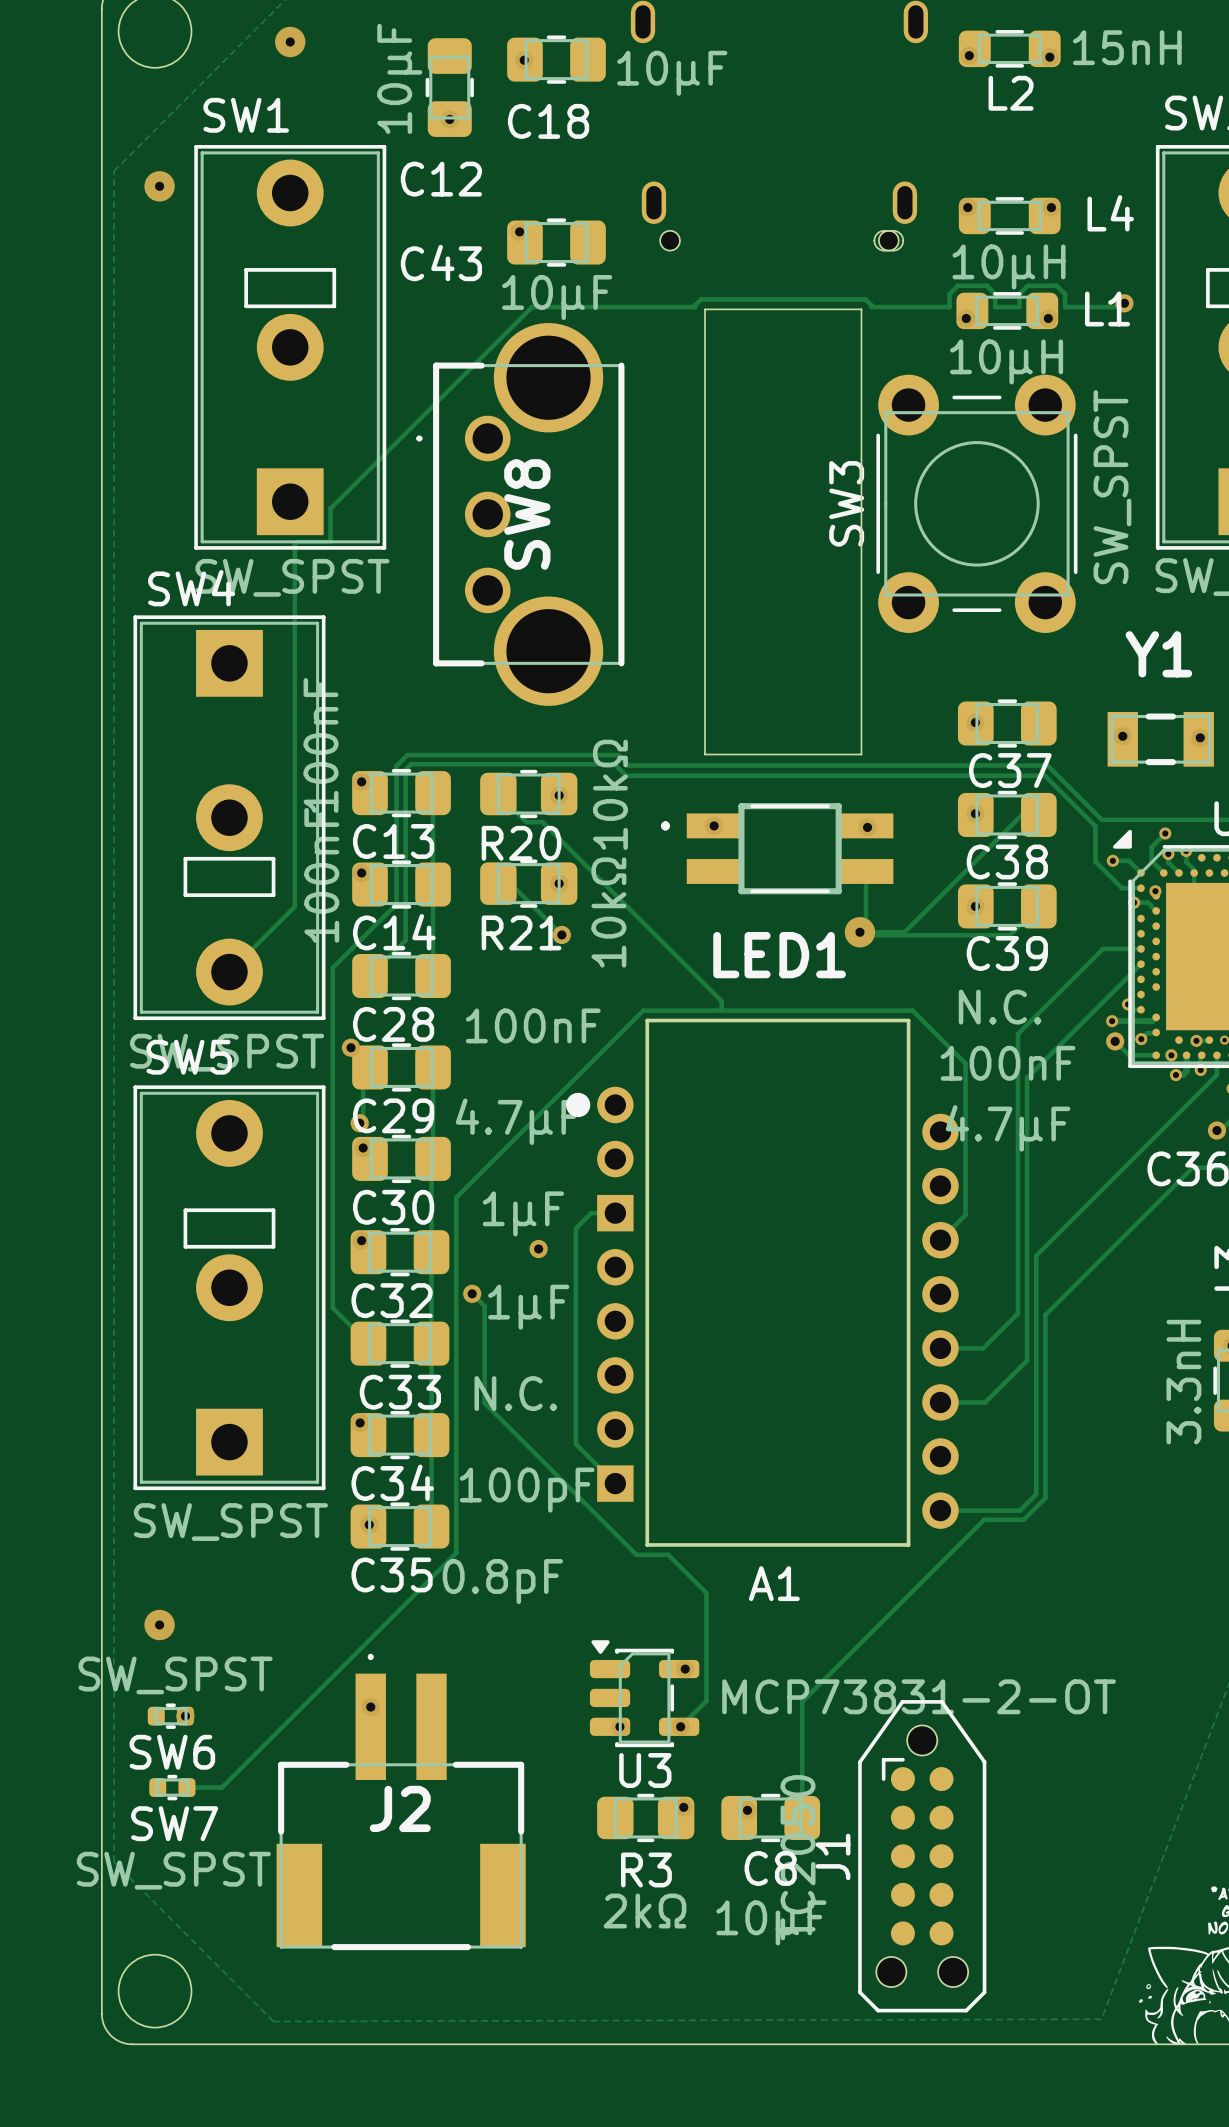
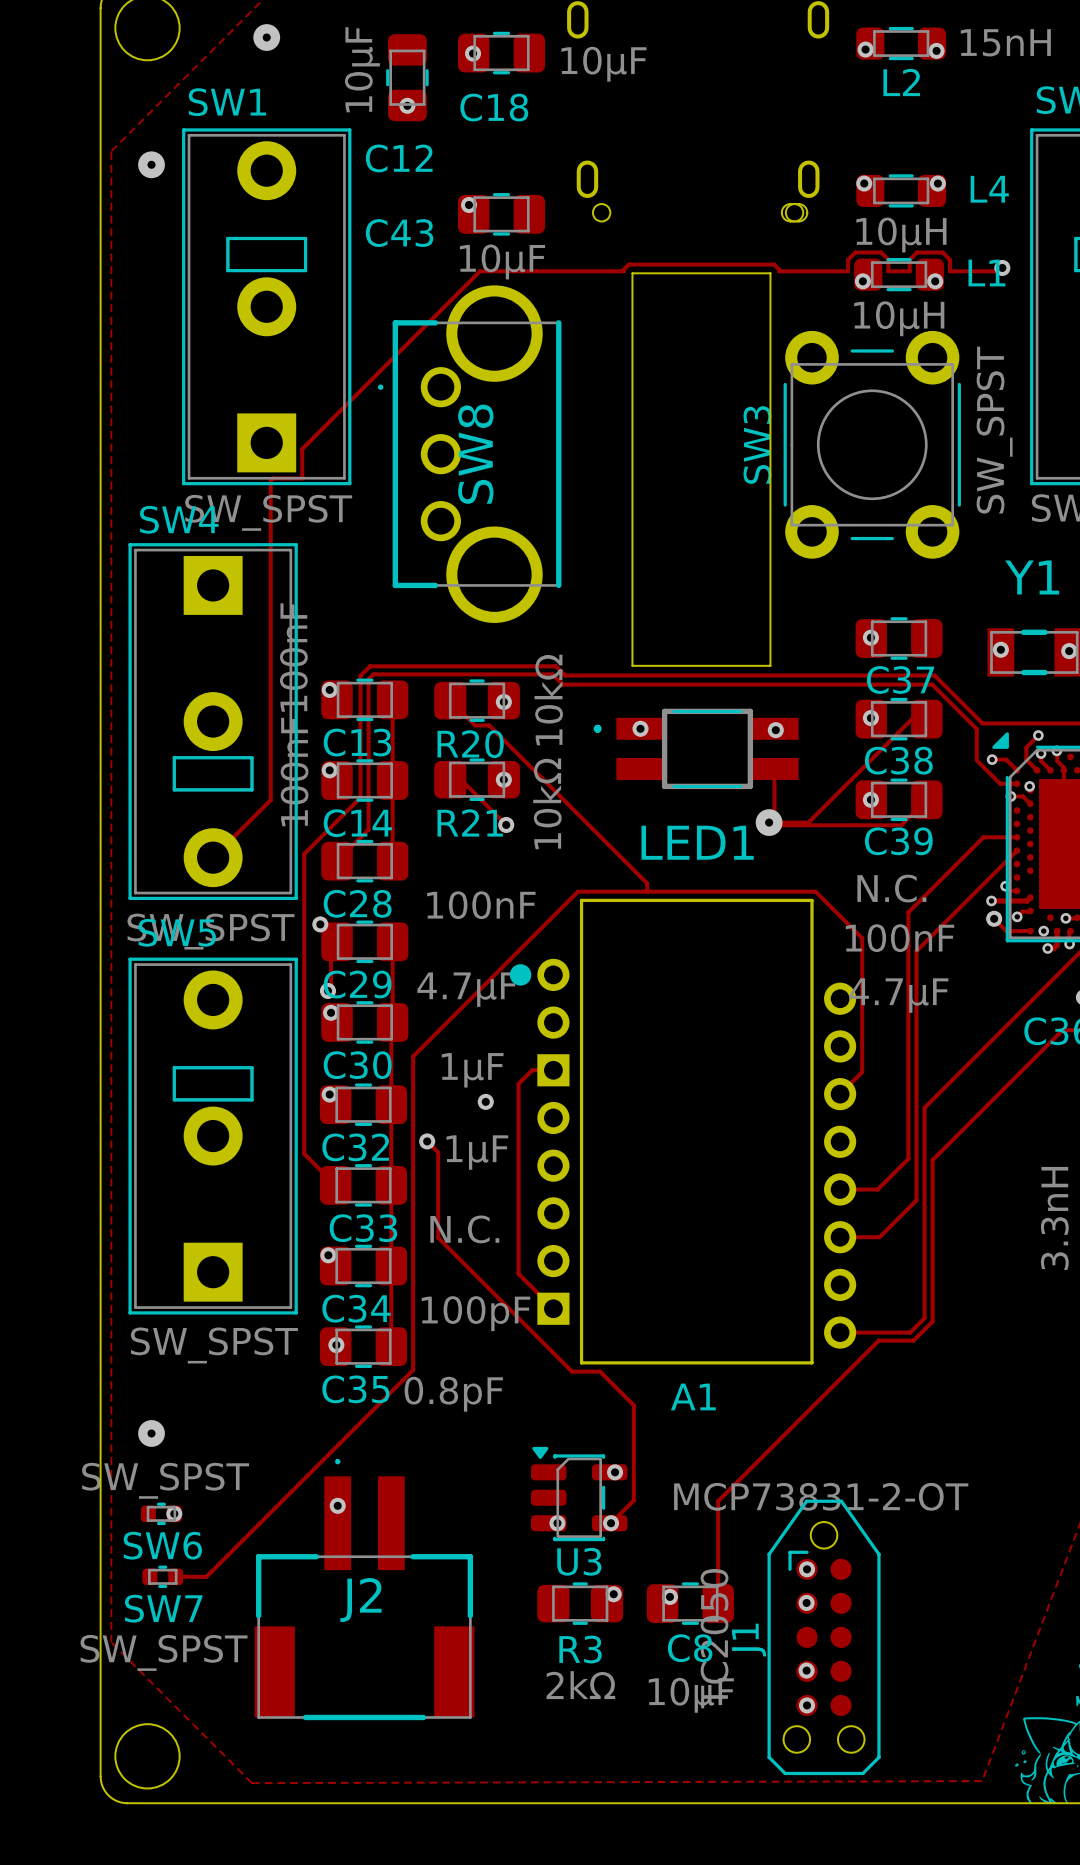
via: none -> (807, 1569)
via: none -> (806, 1602)
via: none -> (806, 1670)
via: none -> (807, 1705)

